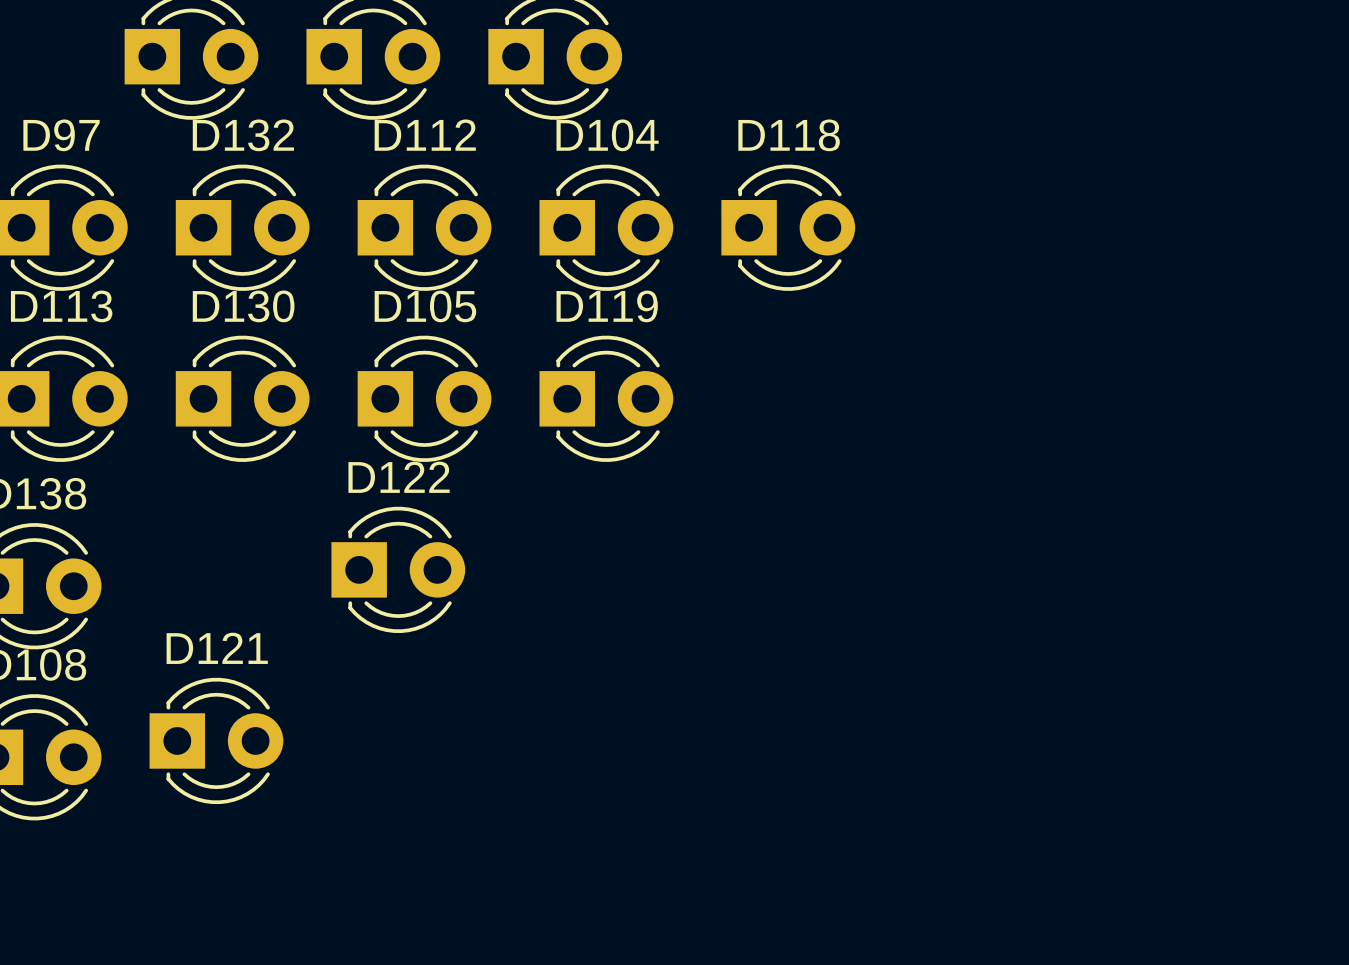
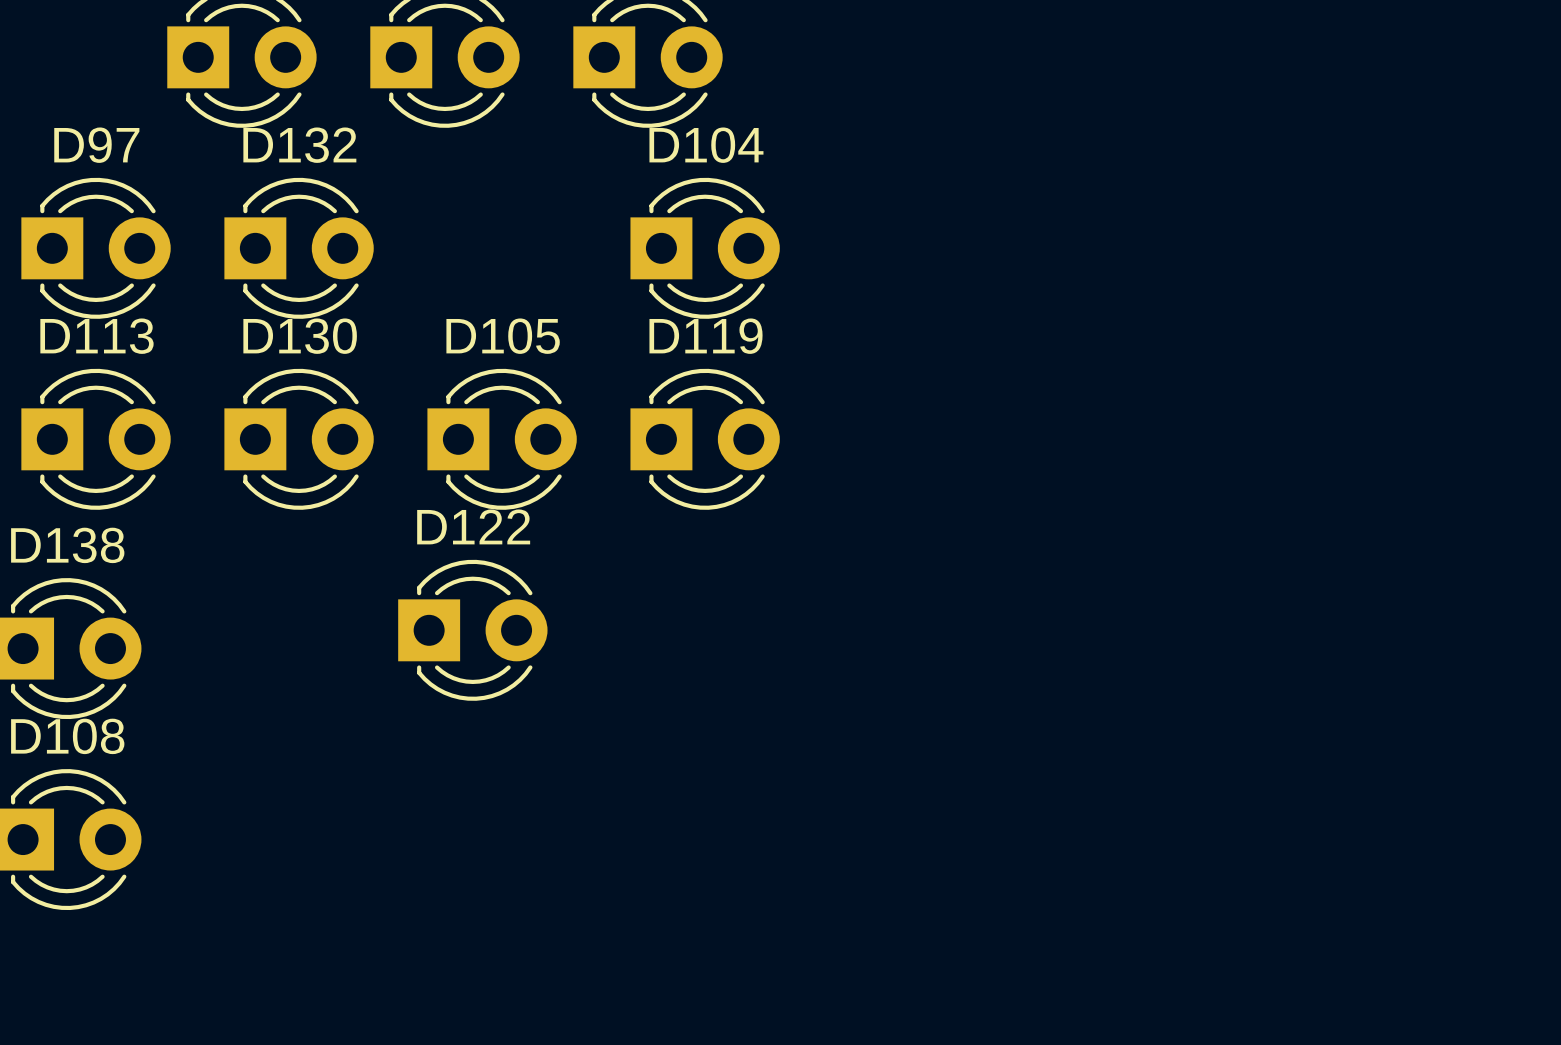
D112: (424, 227) -> none
D118: (788, 227) -> none
D121: (216, 740) -> none

